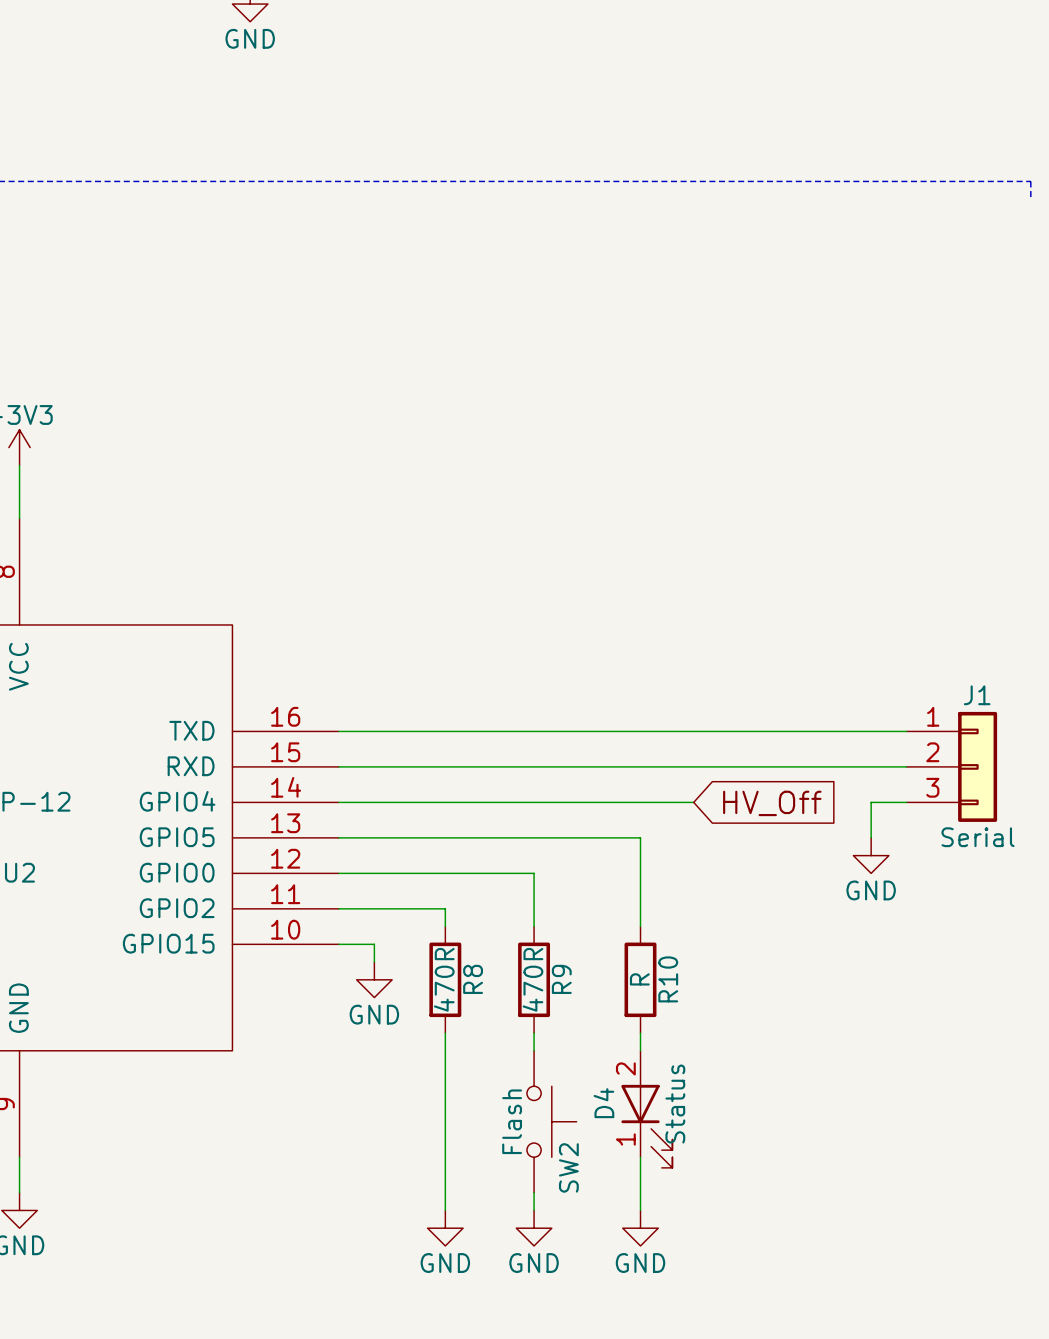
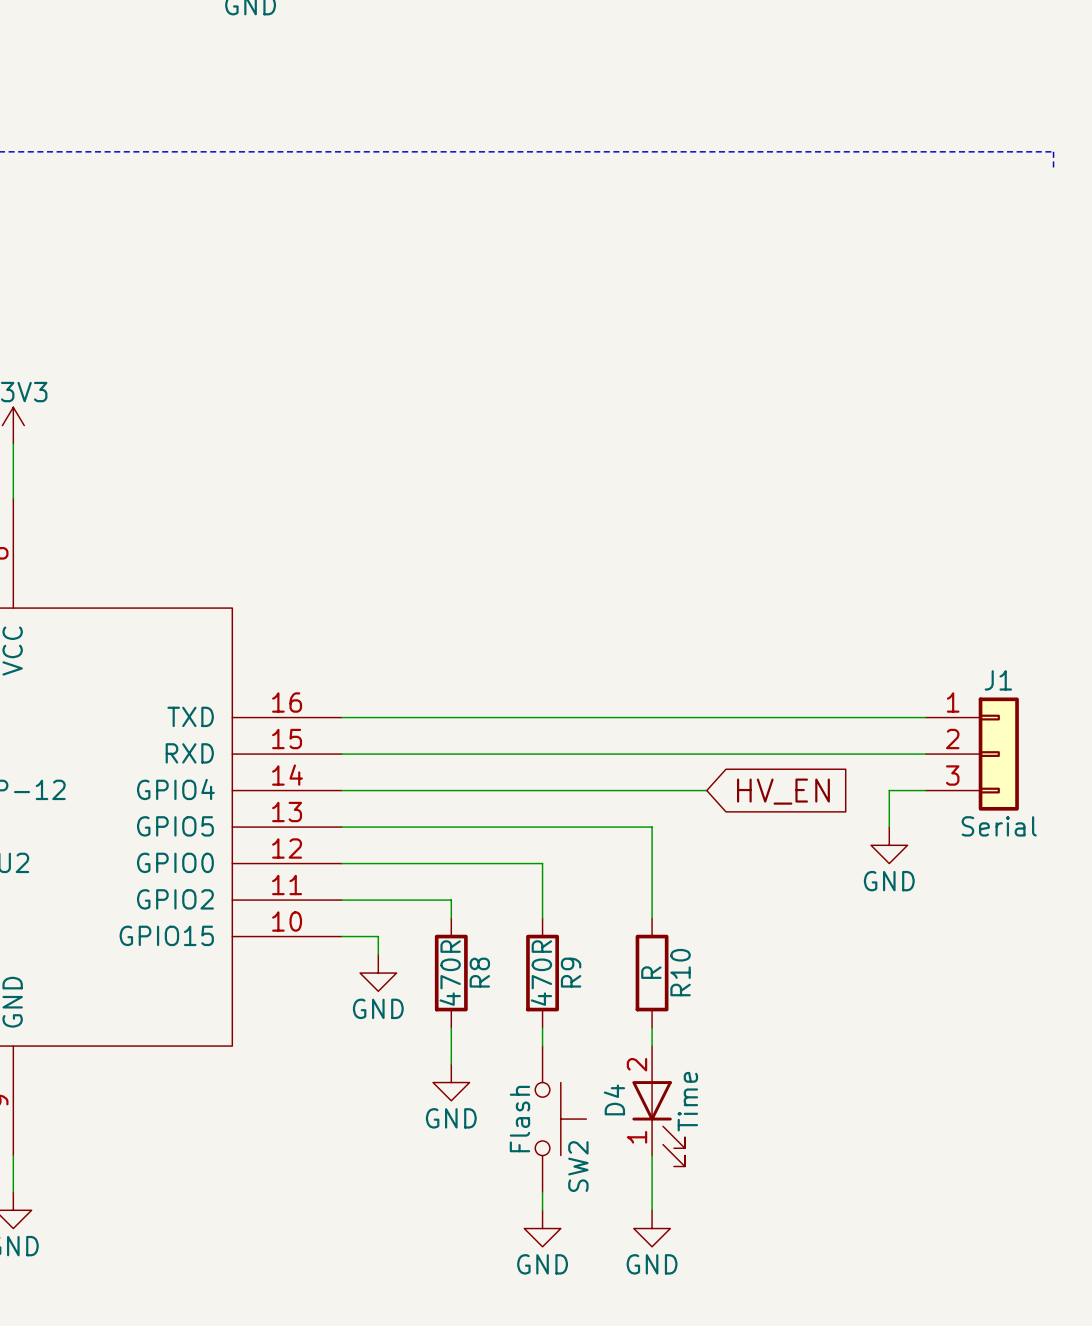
global label: HV_Off (772, 803) -> HV_EN (783, 791)
wire: (445, 1068) (445, 1210) -> none
D4 value: Status (675, 1104) -> Time (687, 1101)
power symbol position: GND (445, 1228) -> GND (451, 1082)

